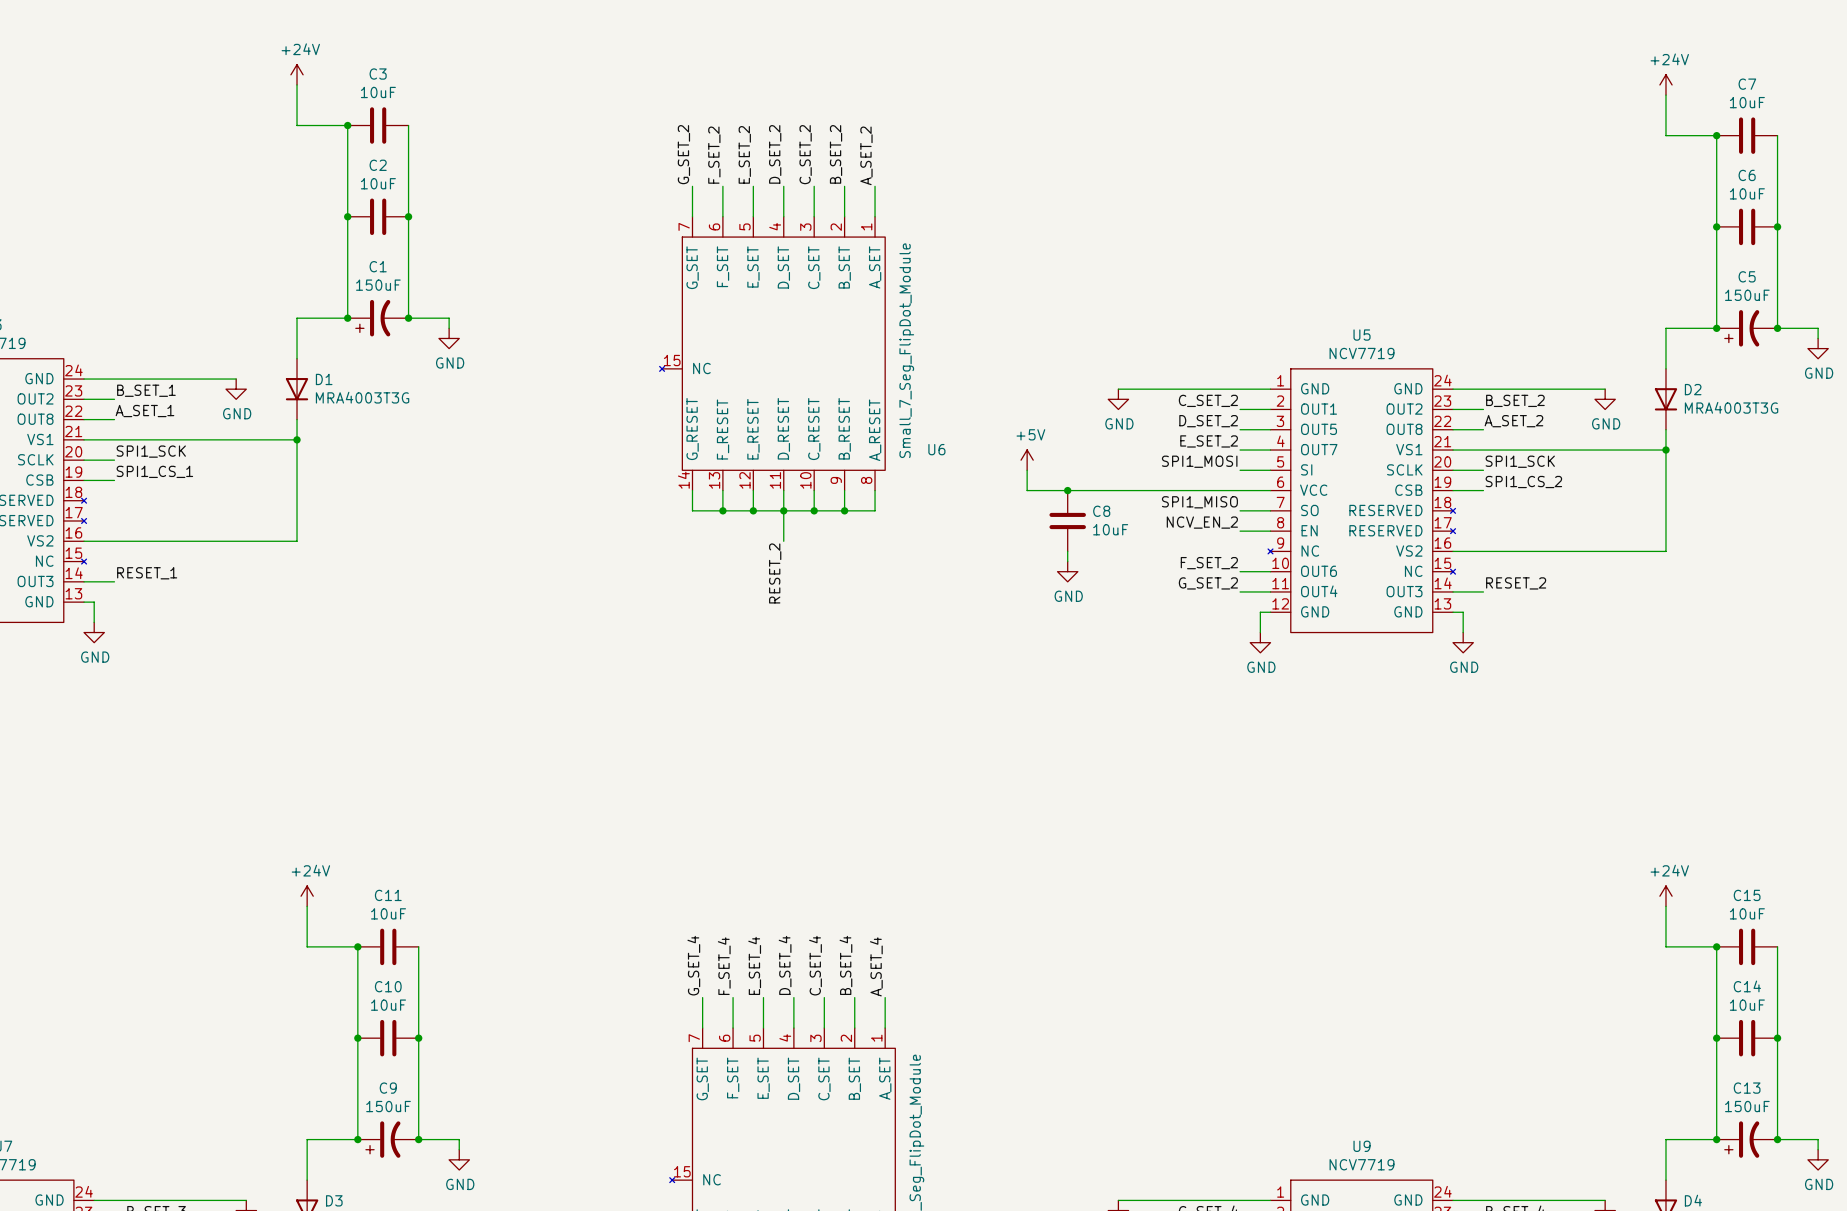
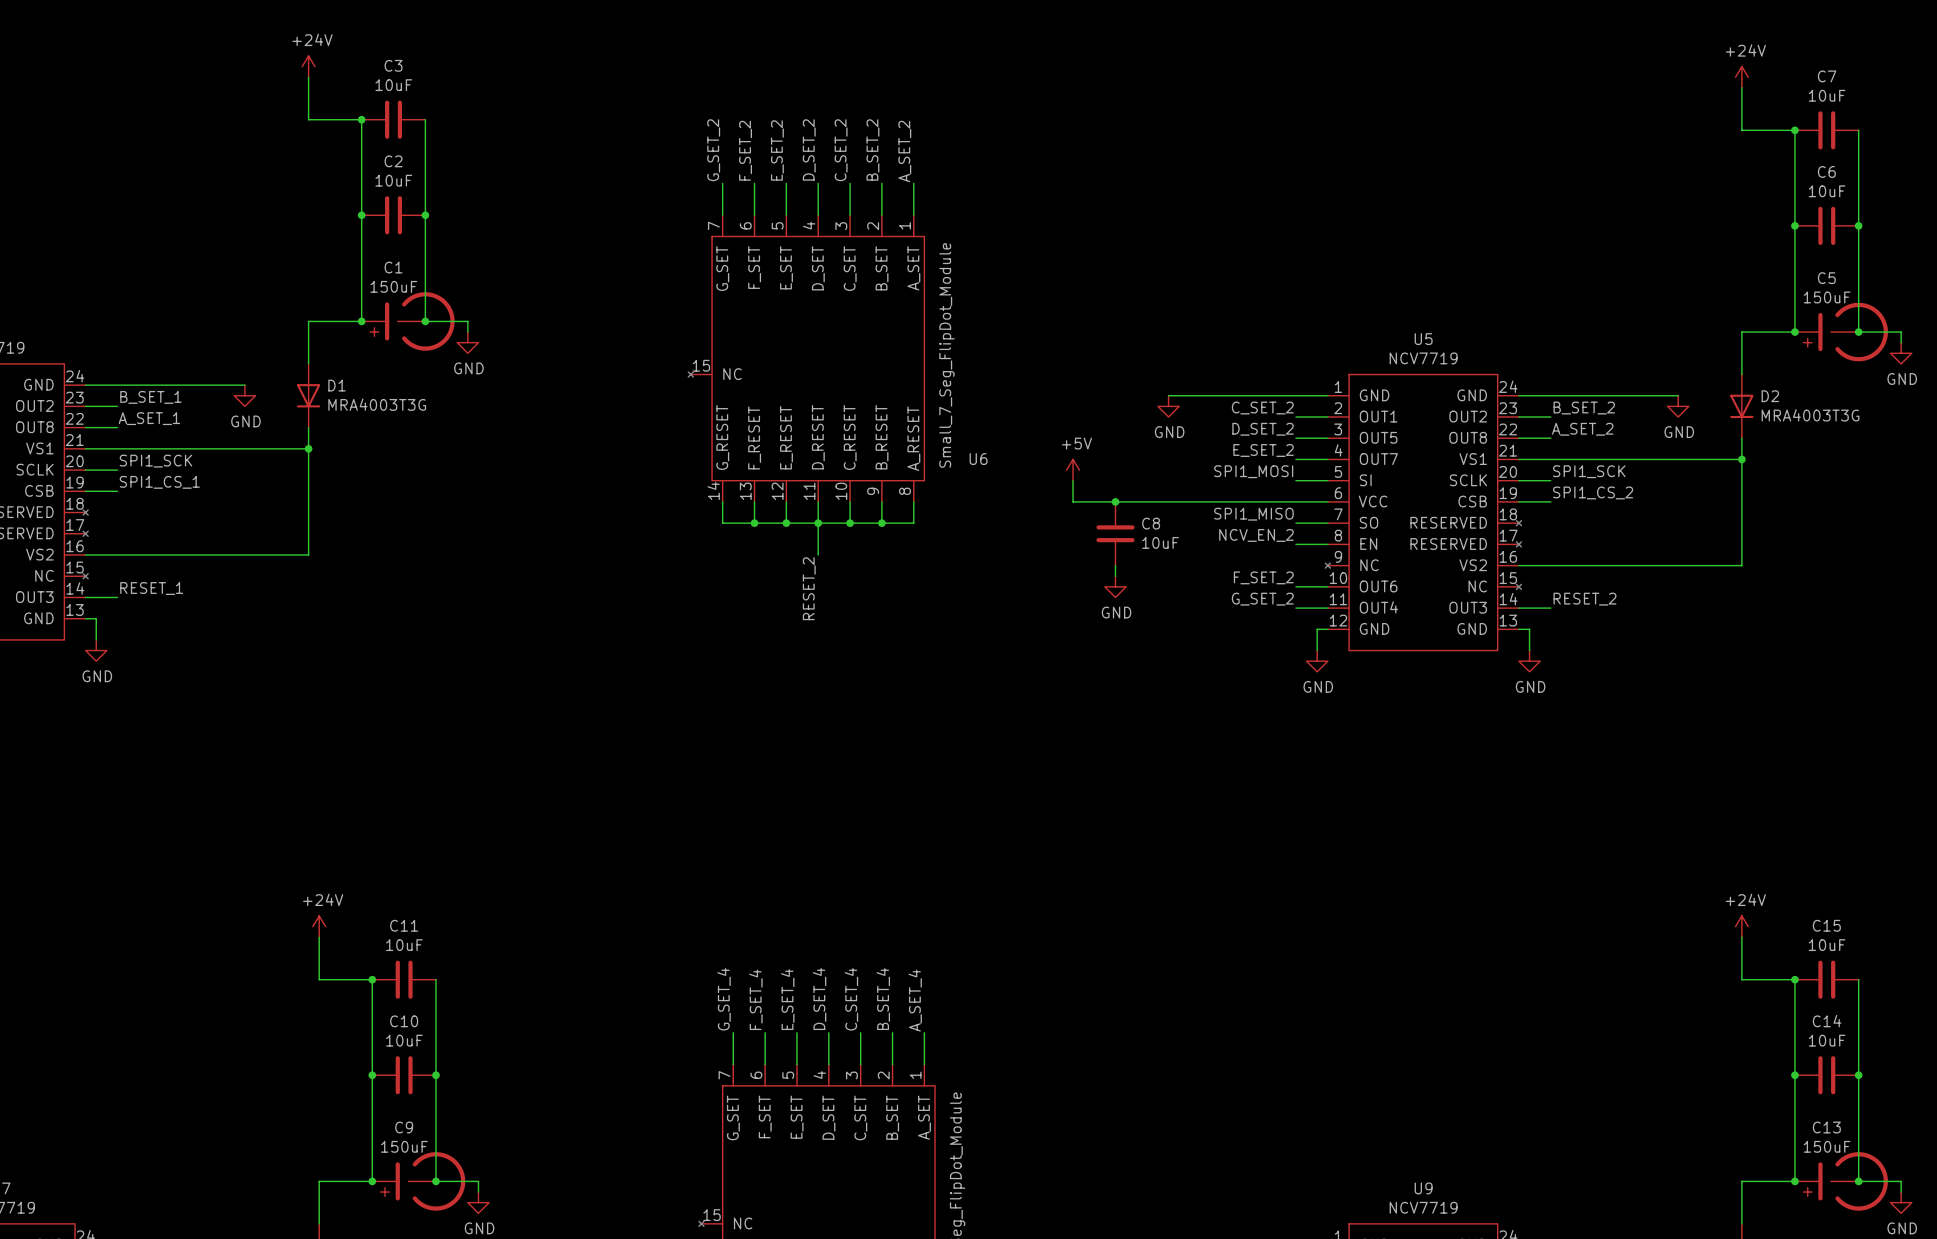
C1 symbol: [347, 299, 409, 337] -> [361, 292, 455, 351]
C5 symbol: [1716, 310, 1778, 347] -> [1794, 302, 1888, 362]
C9 symbol: [357, 1121, 419, 1158] -> [372, 1152, 466, 1211]
C13 symbol: [1716, 1121, 1778, 1158] -> [1794, 1152, 1888, 1211]

